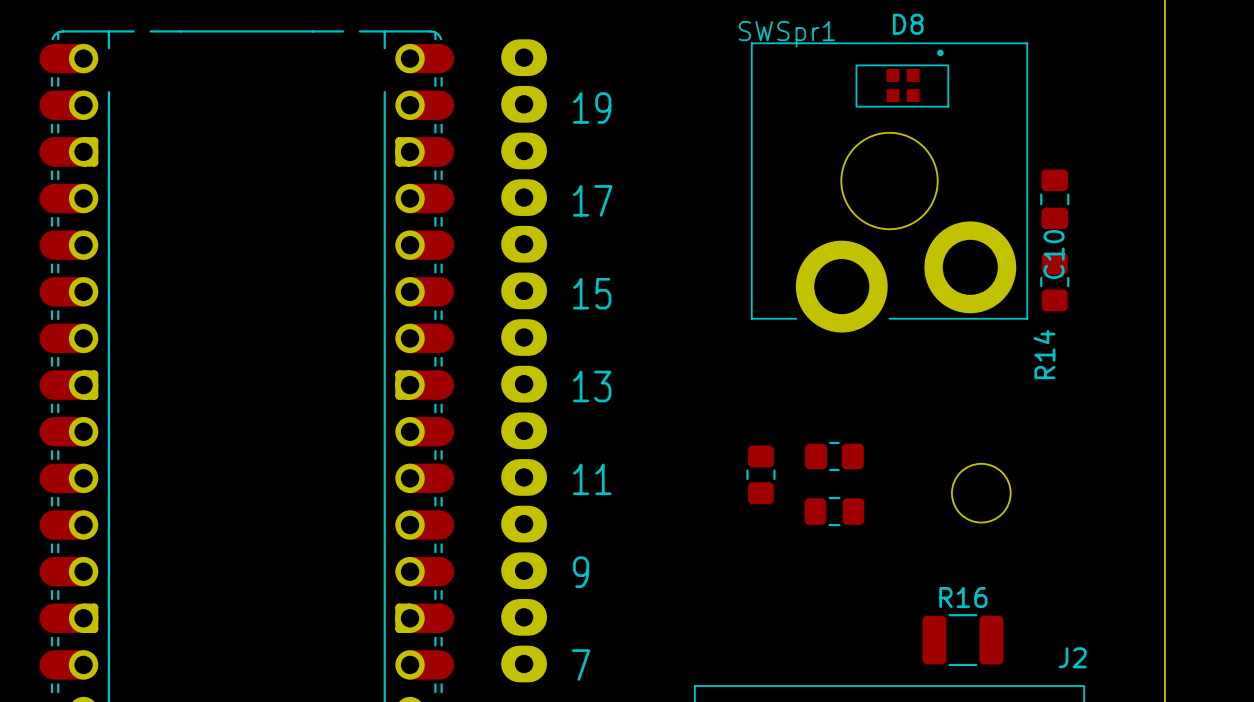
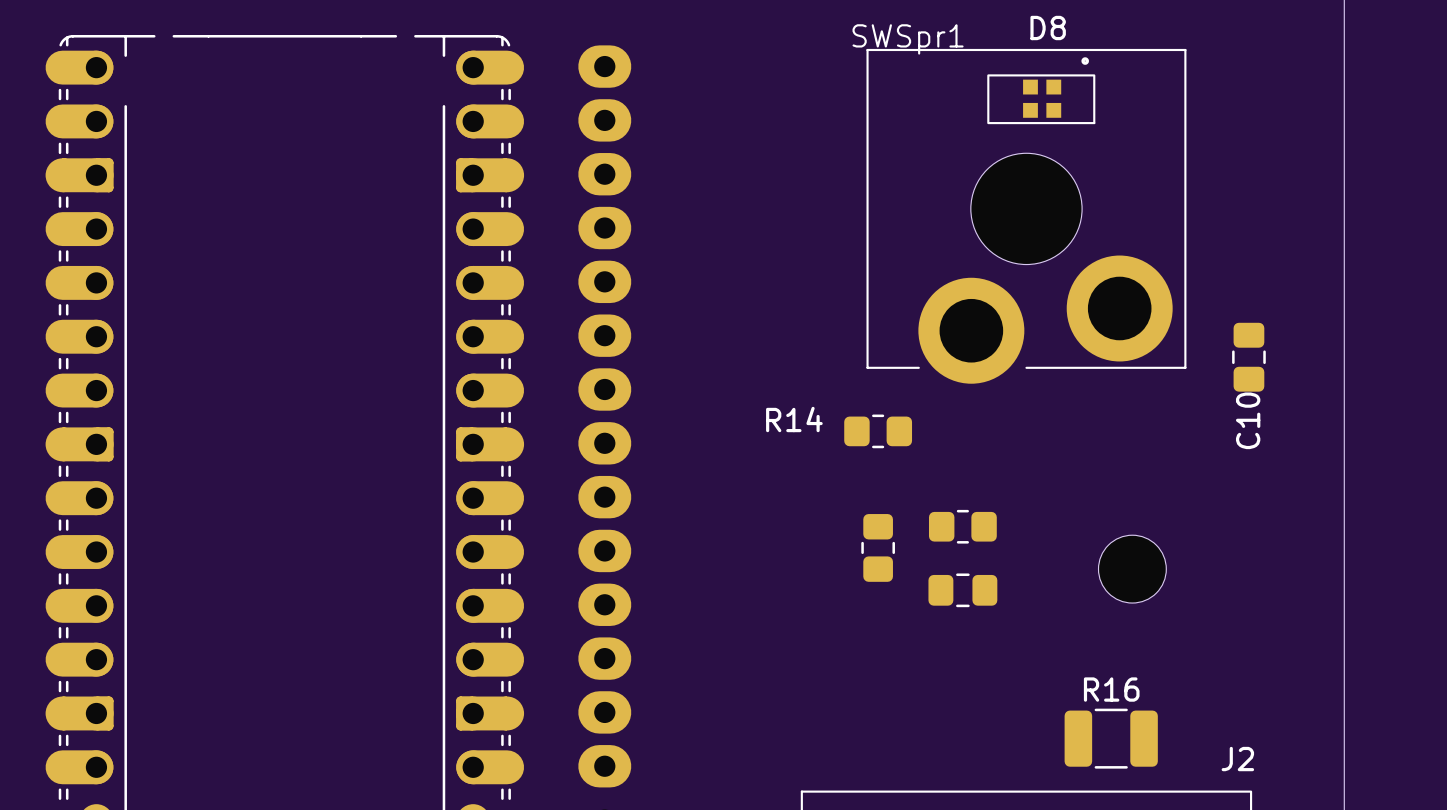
text: 19 (592, 108) -> none
C10 position: (1054, 199) -> (1248, 357)
text: 17 (592, 200) -> none
R14 rotation: 0° (1054, 282) -> 90° clockwise (878, 431)
R14 position: (1054, 282) -> (878, 431)
text: 15 (592, 293) -> none
text: 13 (592, 386) -> none
text: 11 (592, 479) -> none
text: 9 (581, 572) -> none
text: 7 (581, 665) -> none

